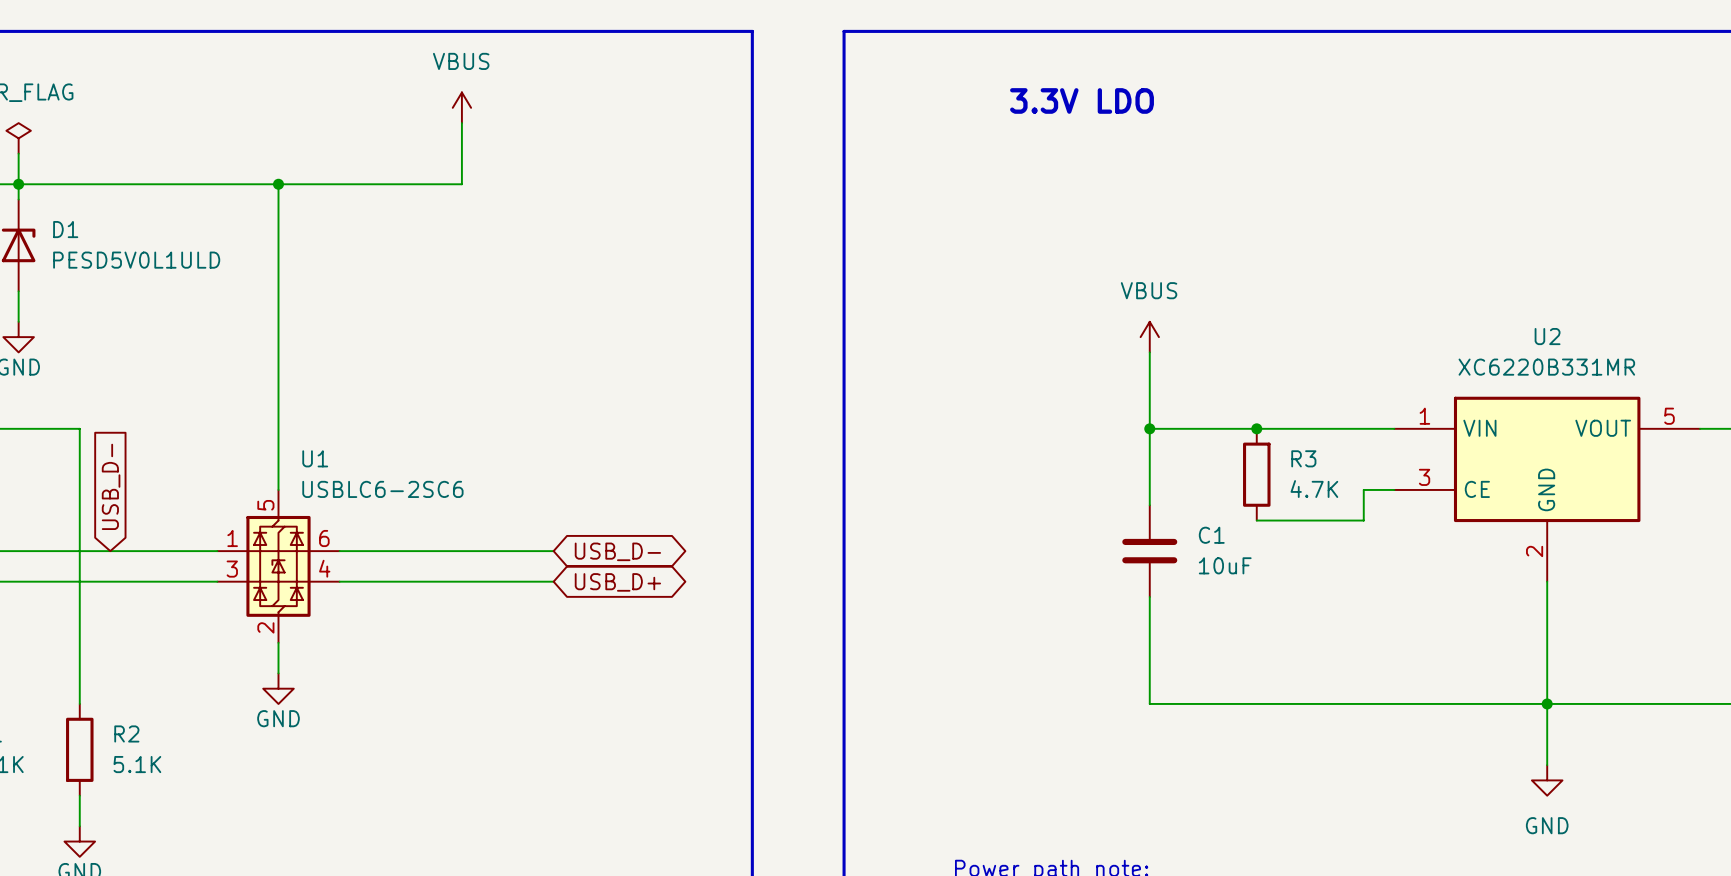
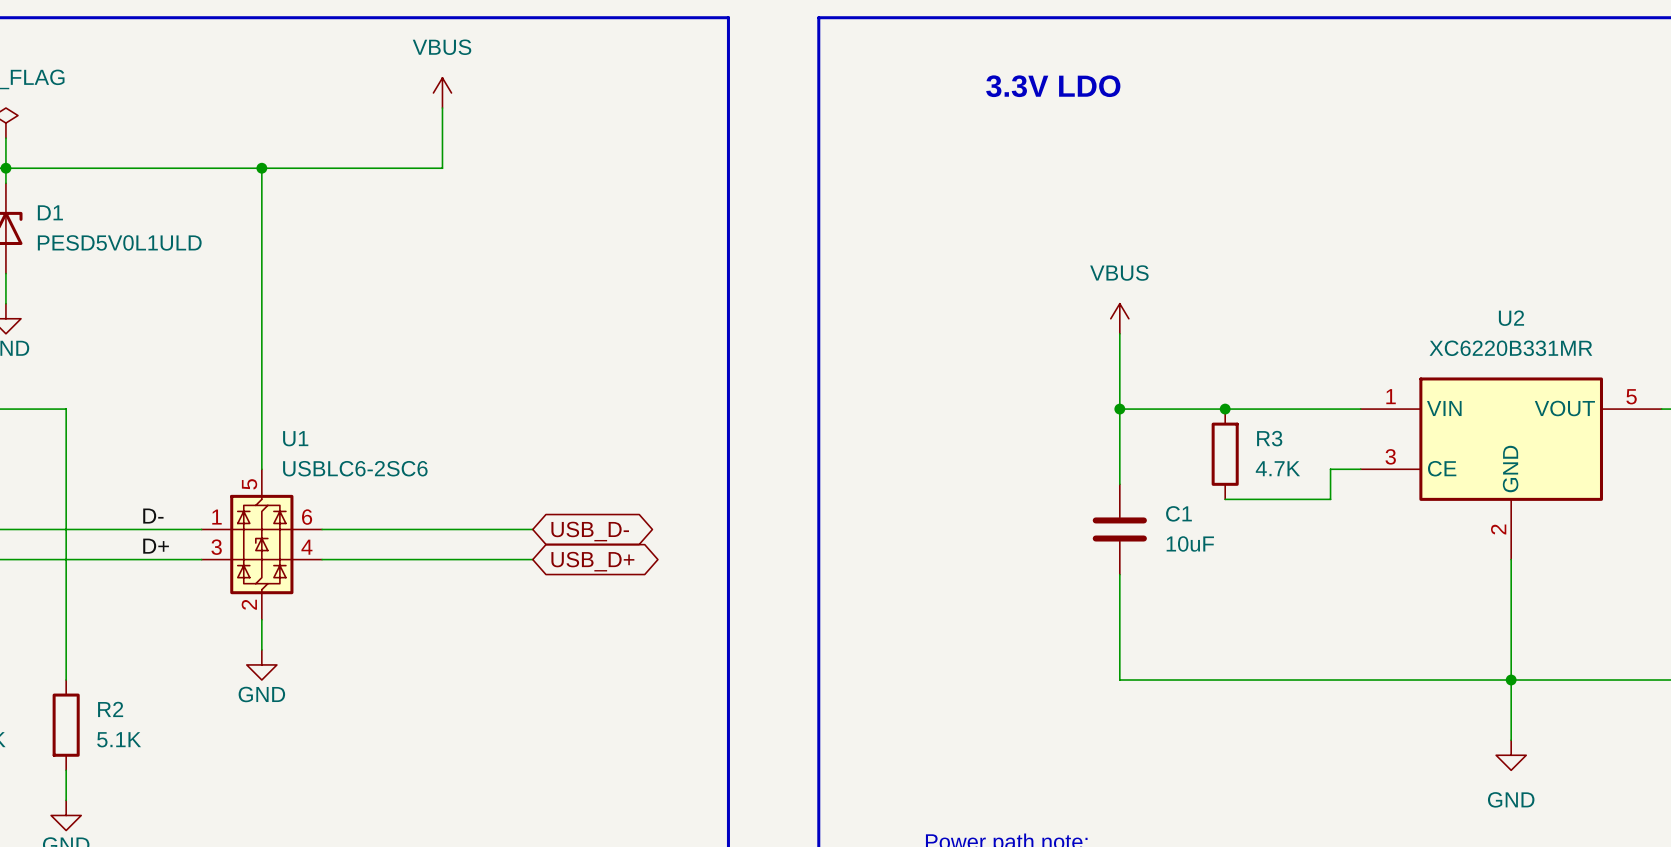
global label: USB_D- (111, 486) -> none
label: none -> D- (153, 516)
label: none -> D+ (156, 546)

